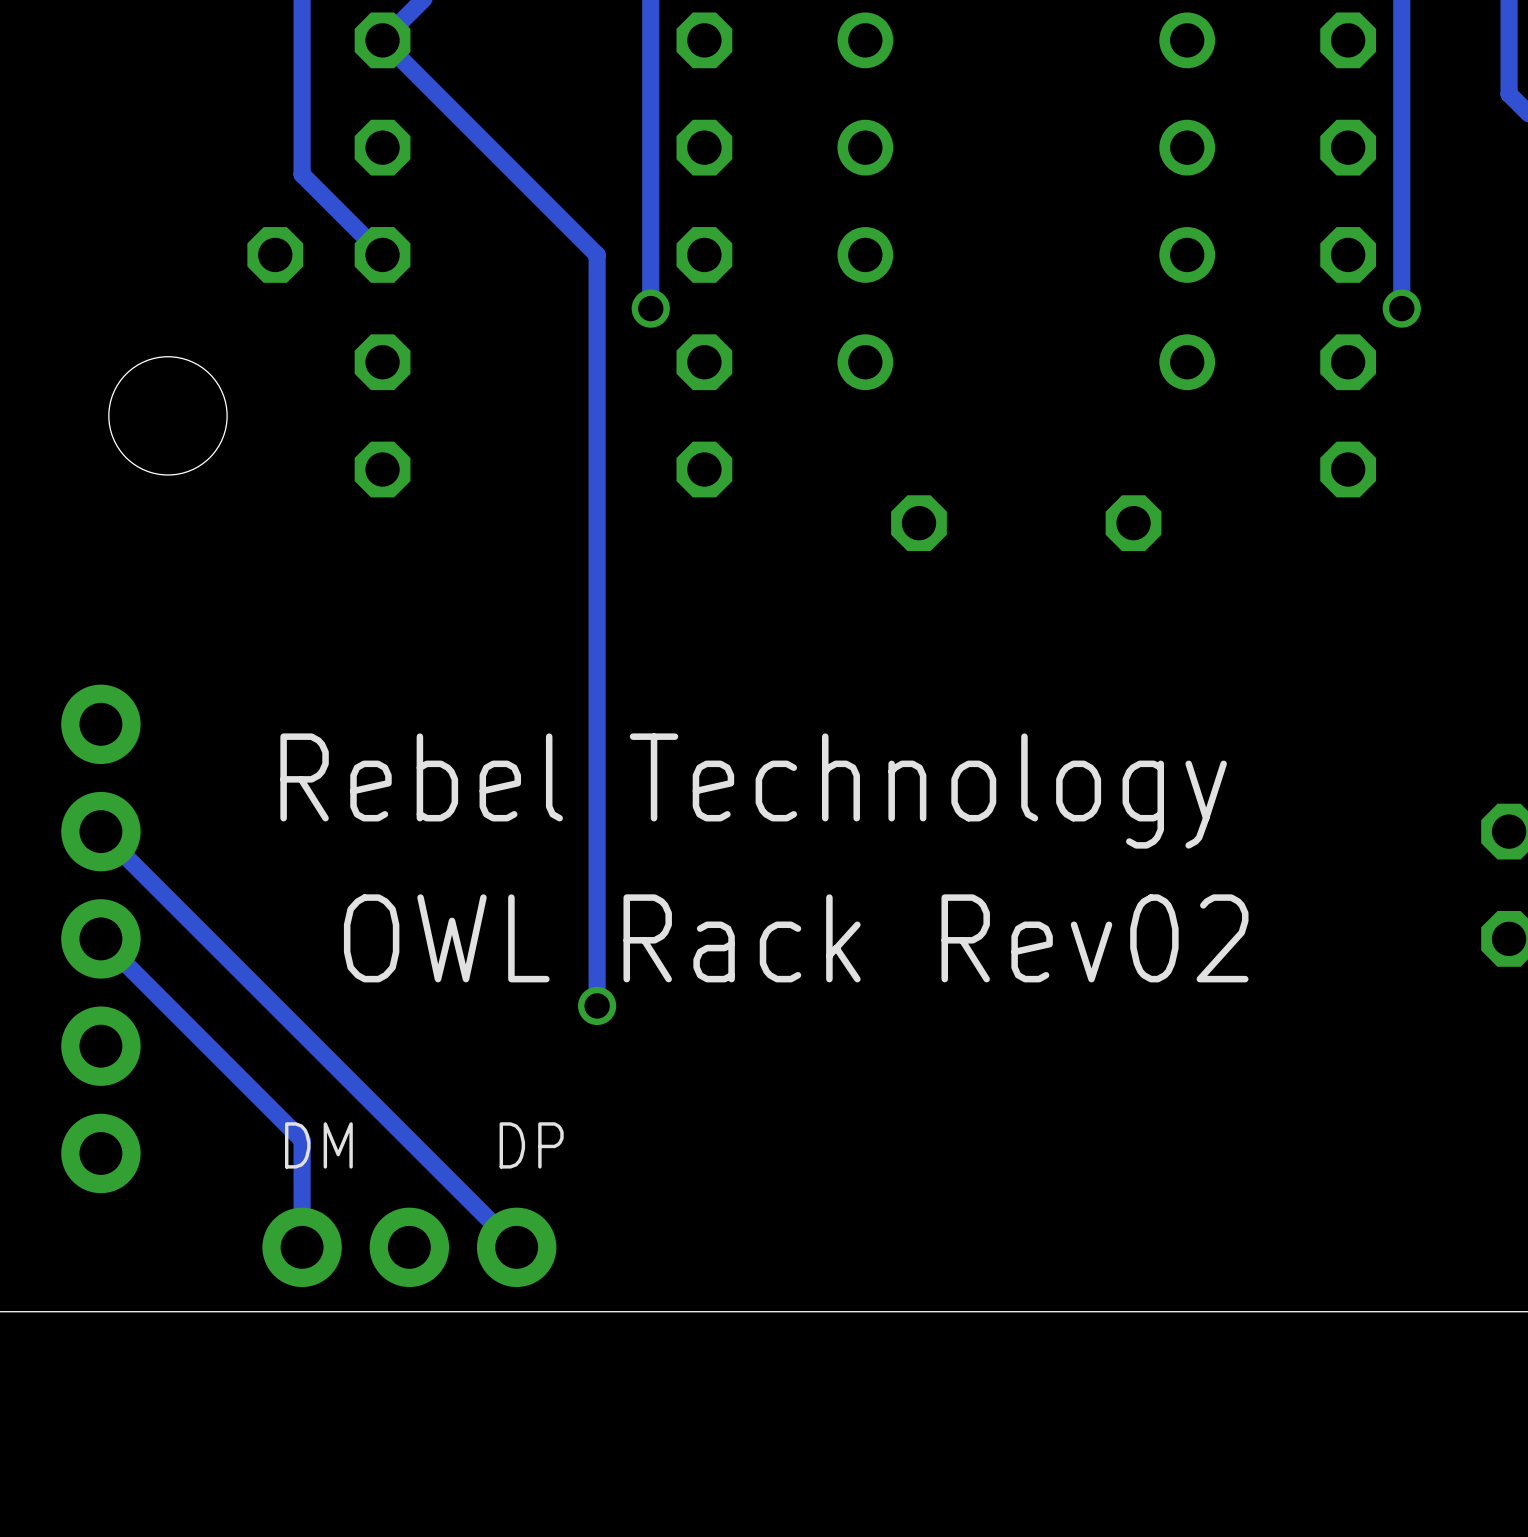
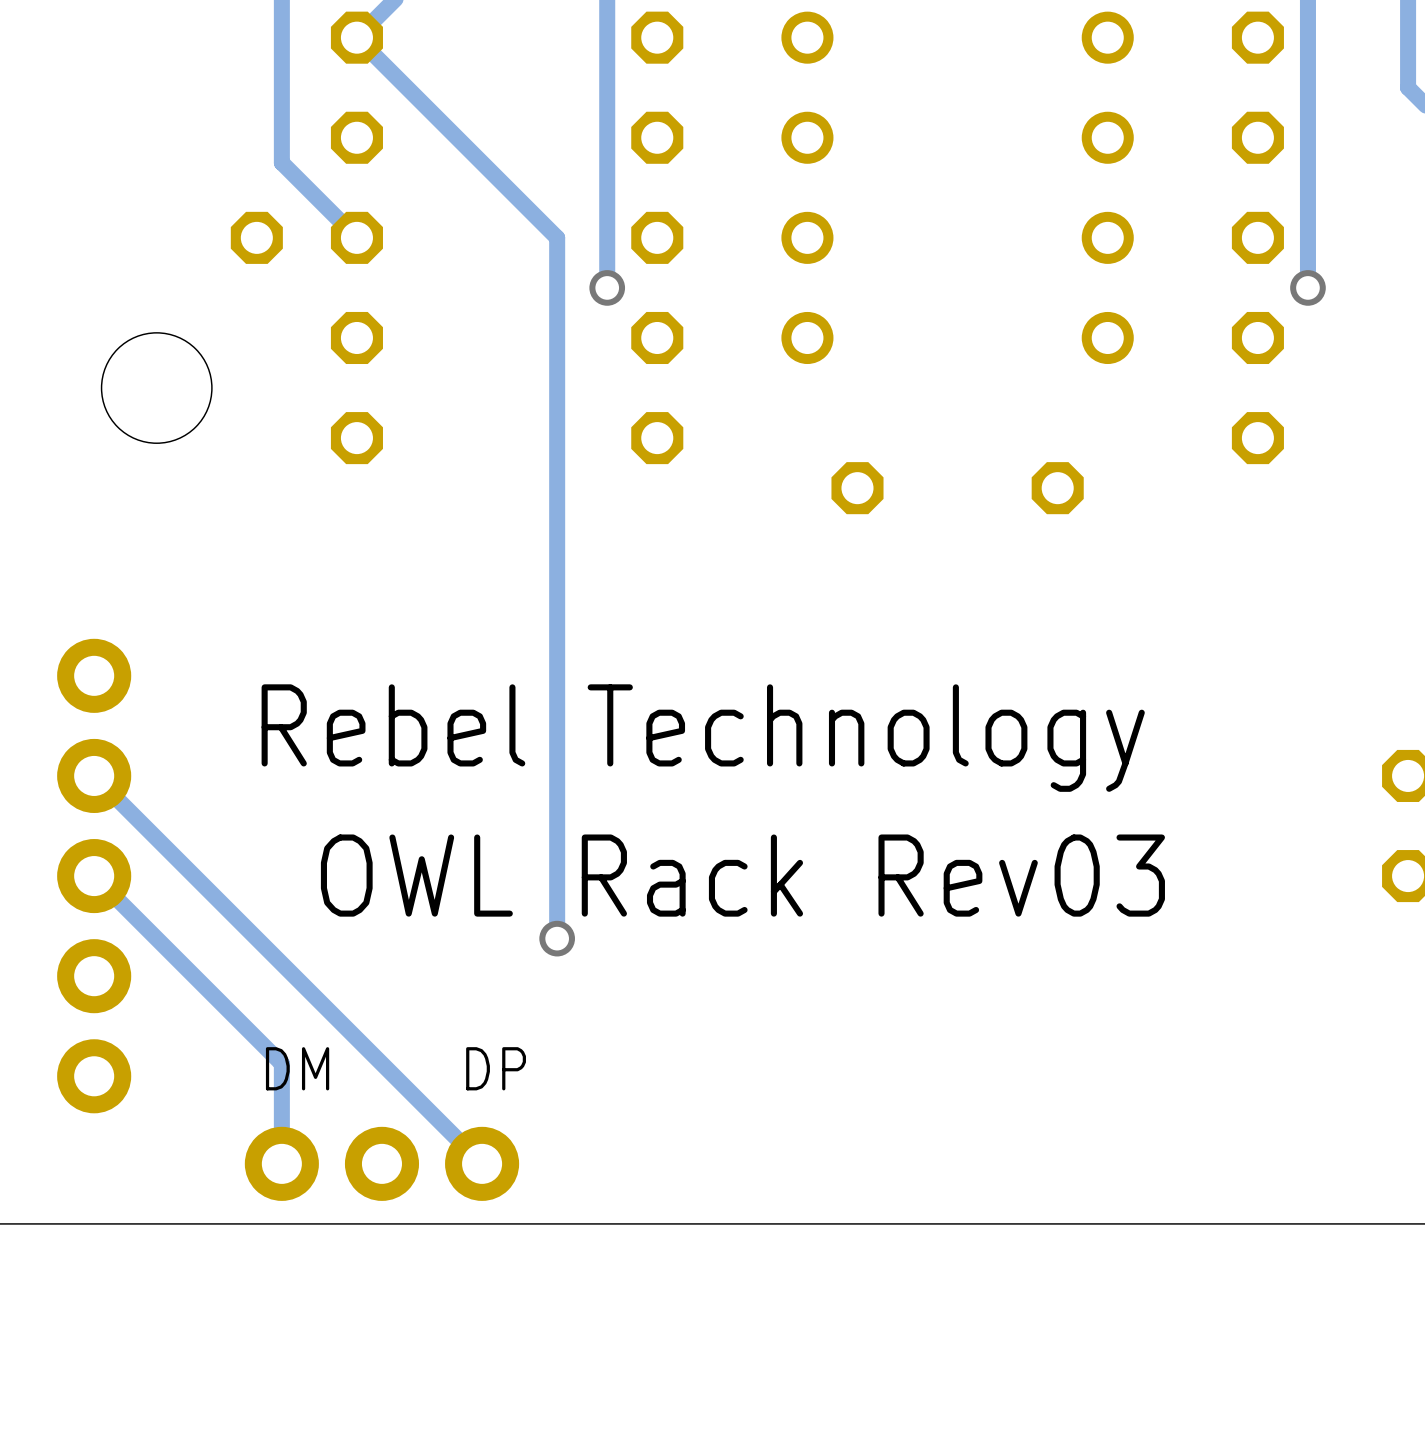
text: OWL Rack Rev02 (796, 938) -> OWL Rack Rev03 (742, 875)

